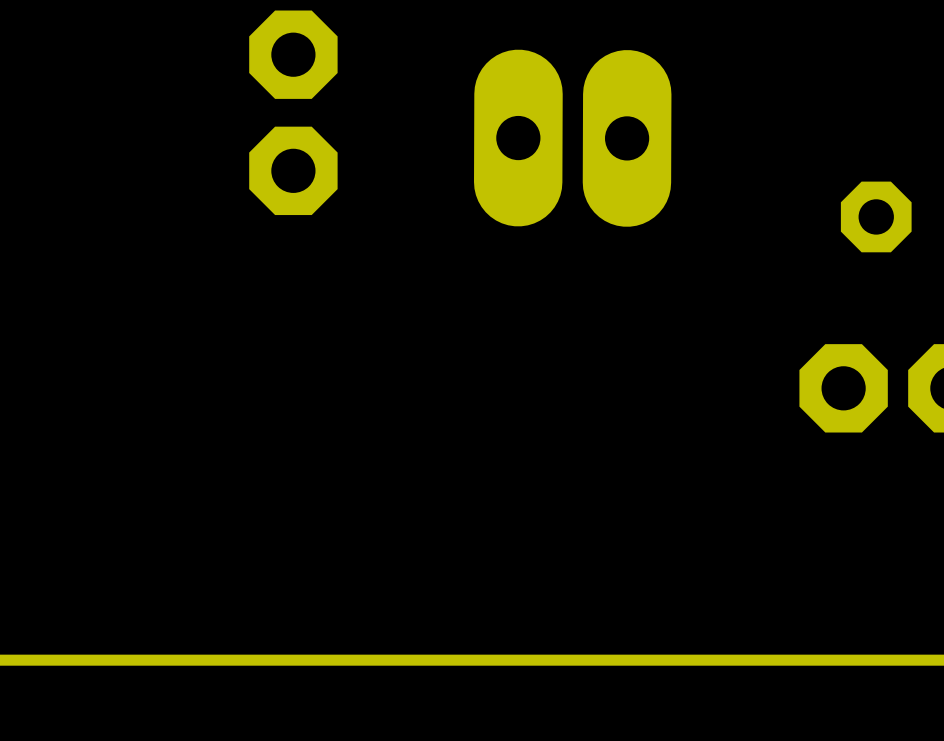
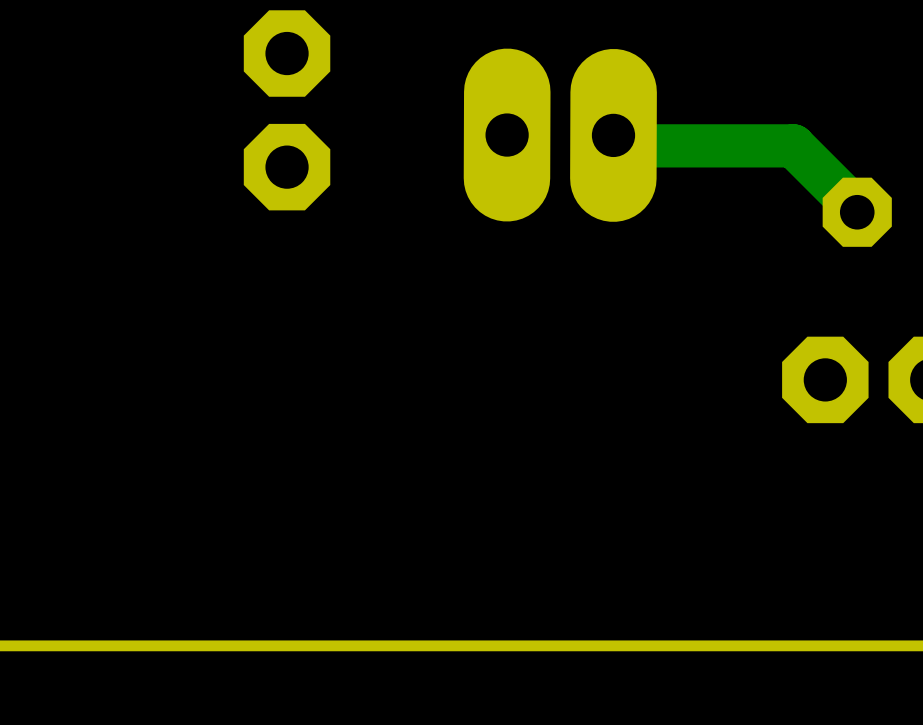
track: none -> (613, 135) (623, 145) (793, 145) (857, 209) (857, 212)

